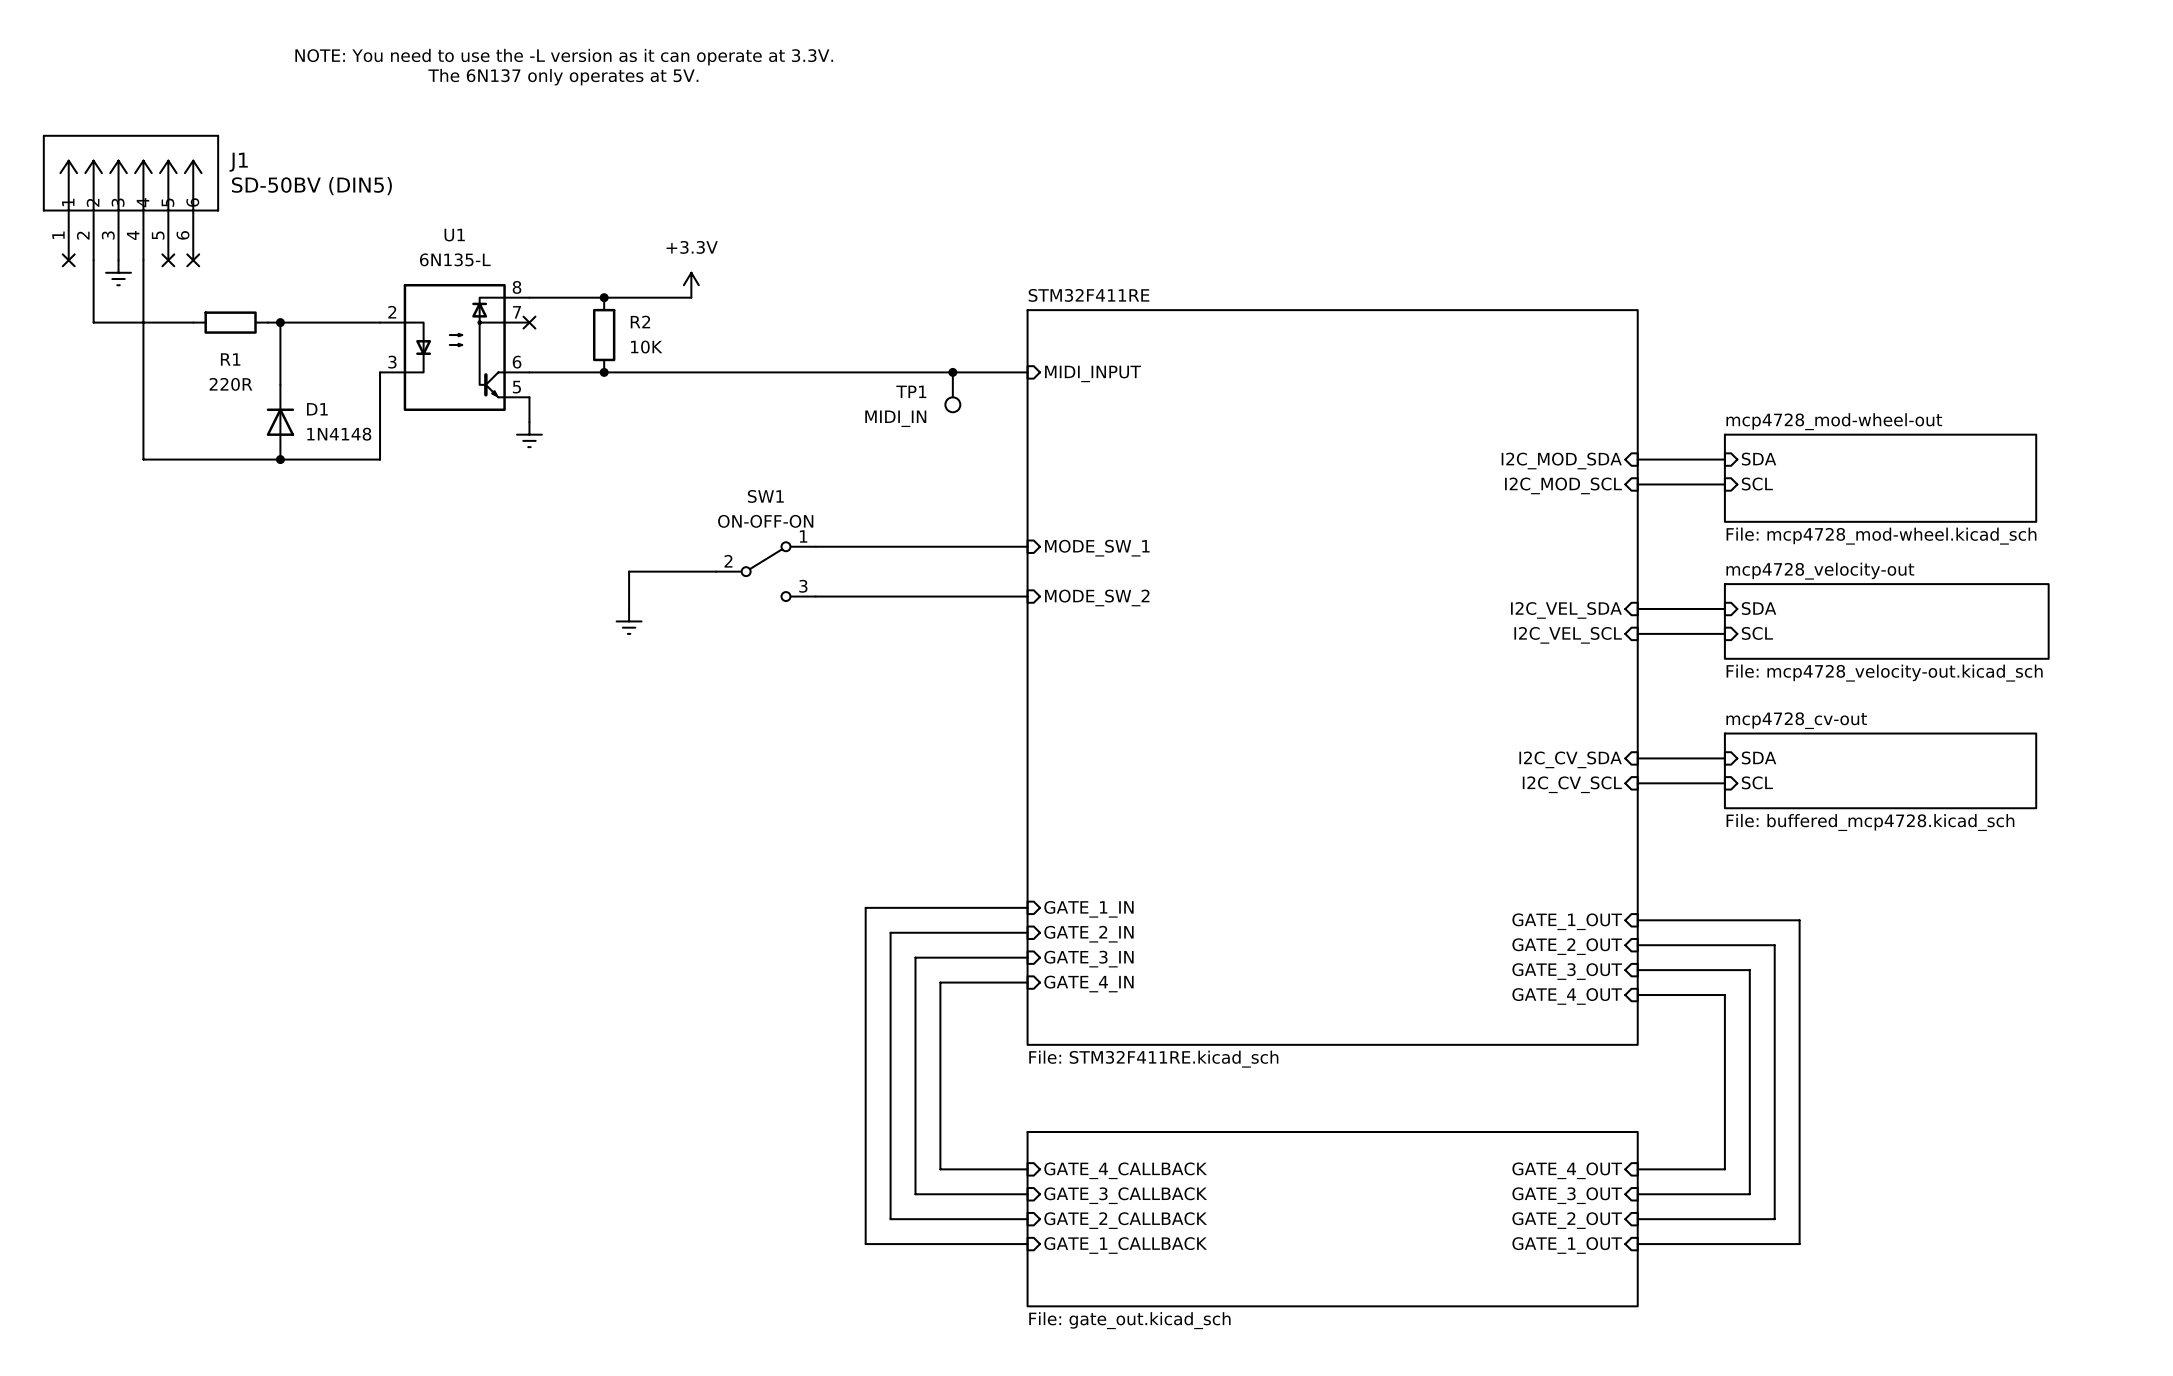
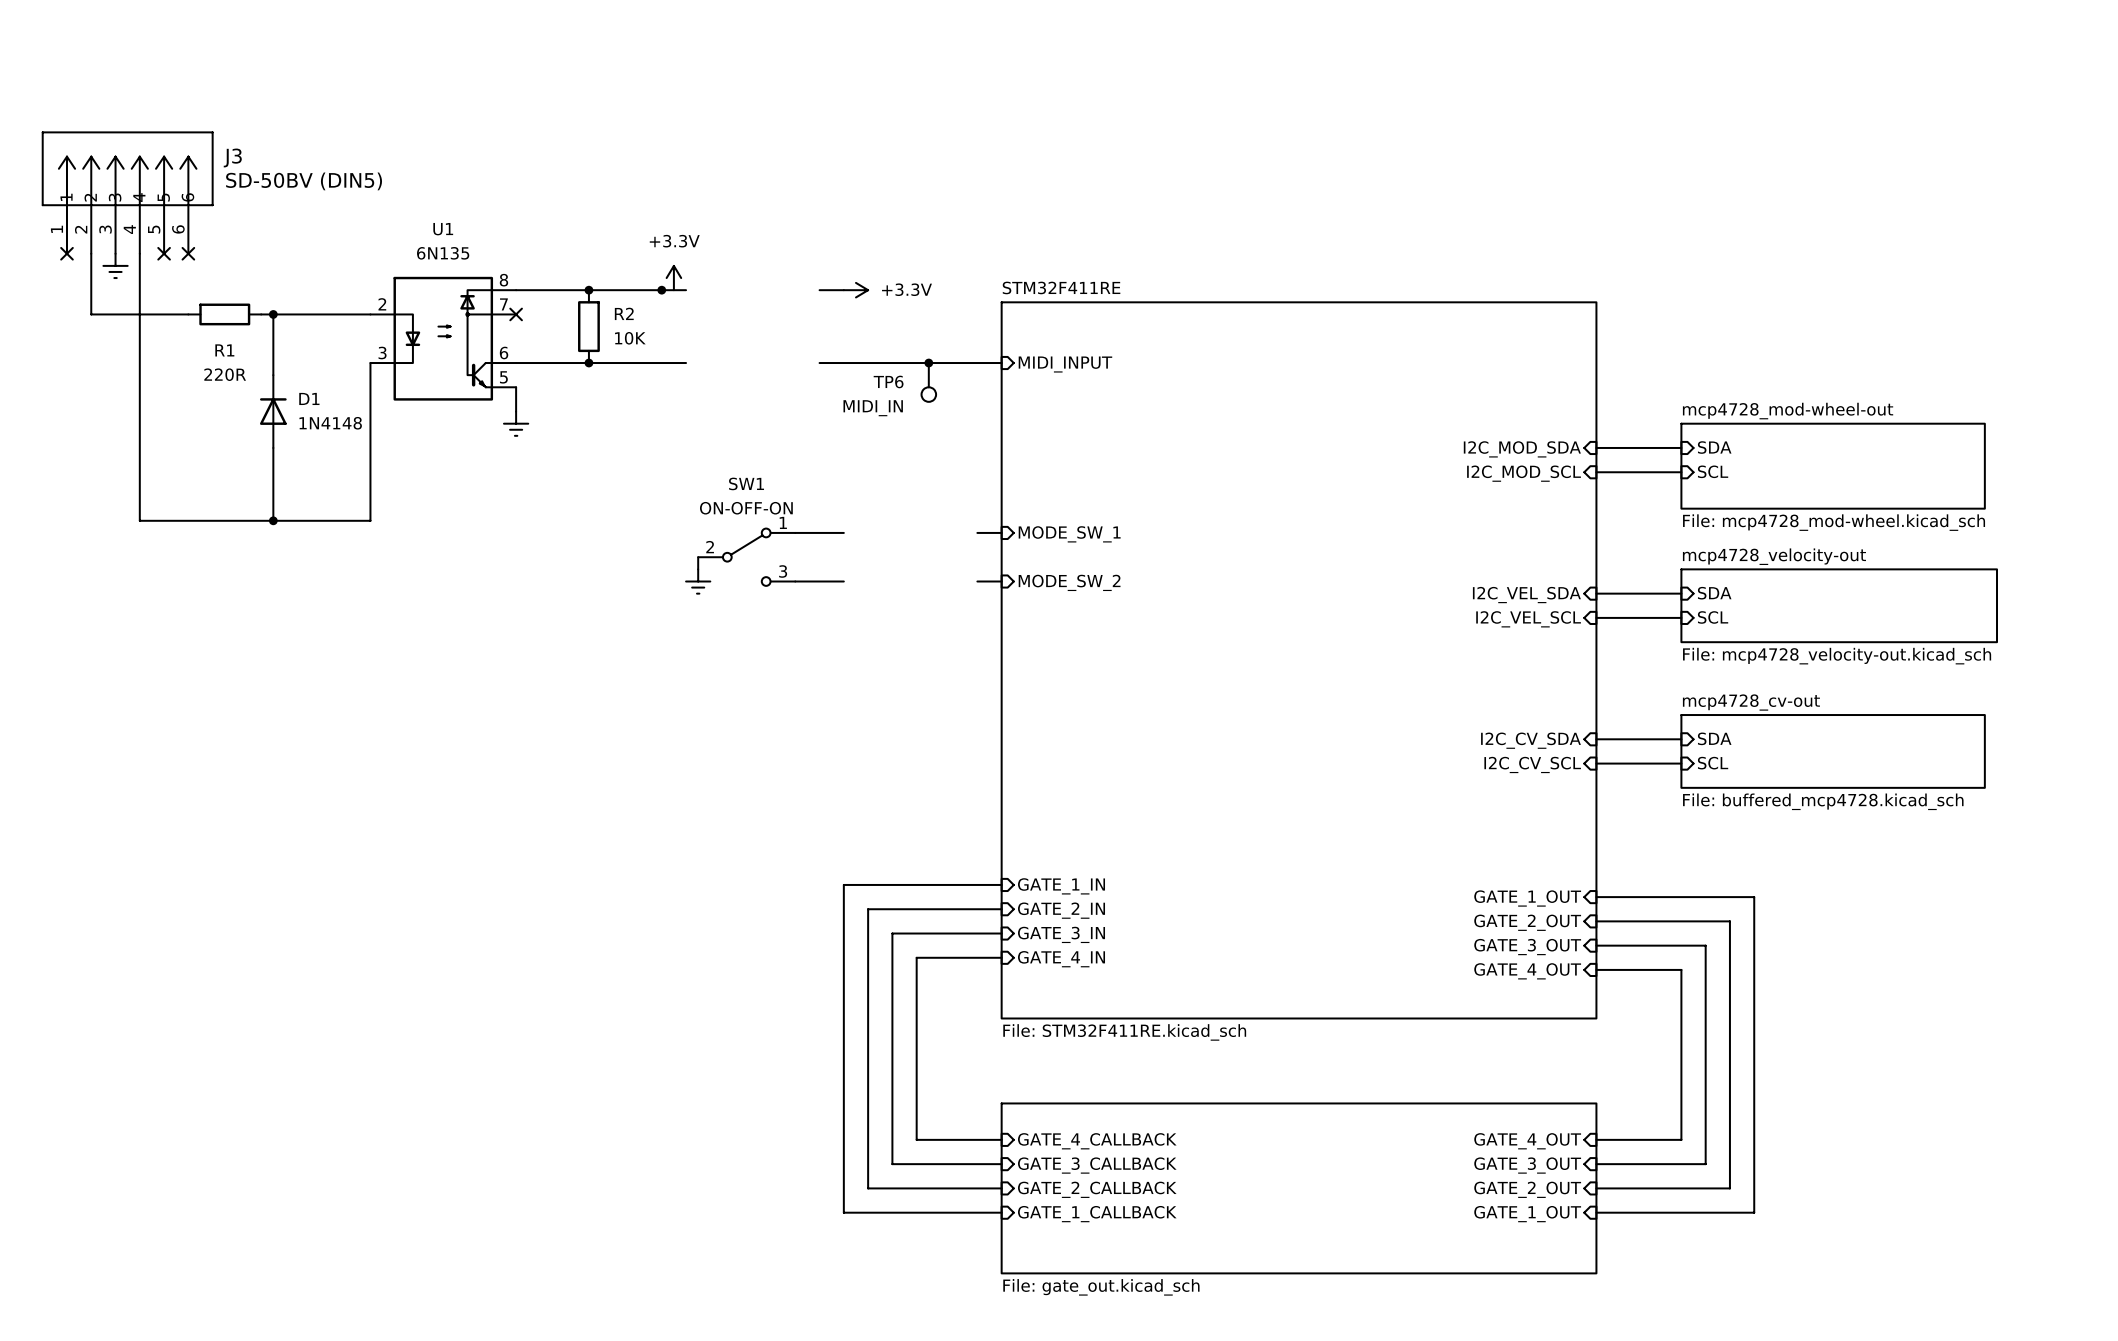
text: NOTE: You need to use the -L version as it can operate at 3.3V. (564, 57) -> none
text: The 6N137 only operates at 5V. (563, 77) -> none
J1 name: J1 (238, 162) -> J3 (232, 157)
U1 value: 6N135-L (455, 259) -> 6N135 (443, 253)
junction: none -> (661, 290)
wire: none -> (673, 290) (686, 290)
wire: none -> (819, 290) (843, 290)
power symbol: none -> +3.3V (855, 290)
wire: (703, 372) (840, 372) -> none
TP1 name: TP1 (911, 391) -> TP6 (888, 381)
wire: (143, 459) (380, 459) -> (139, 447) (139, 520) (370, 520) (370, 447)
wire: none -> (273, 447) (273, 520)
junction: (280, 459) -> none
junction: none -> (273, 520)
wire: (865, 546) (1002, 546) -> none
wire: (716, 571) (629, 571) (629, 608) -> (698, 557) (698, 569)
wire: (865, 596) (1002, 596) -> none
power symbol position: (629, 621) -> (698, 581)

